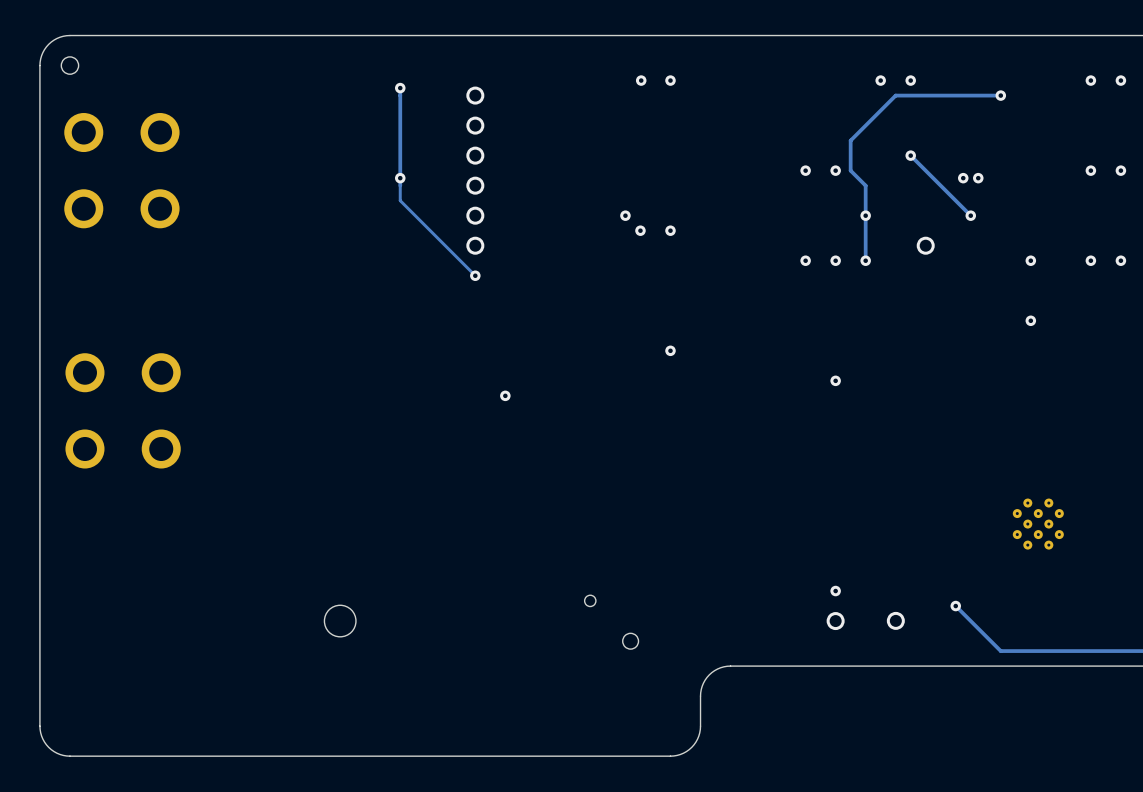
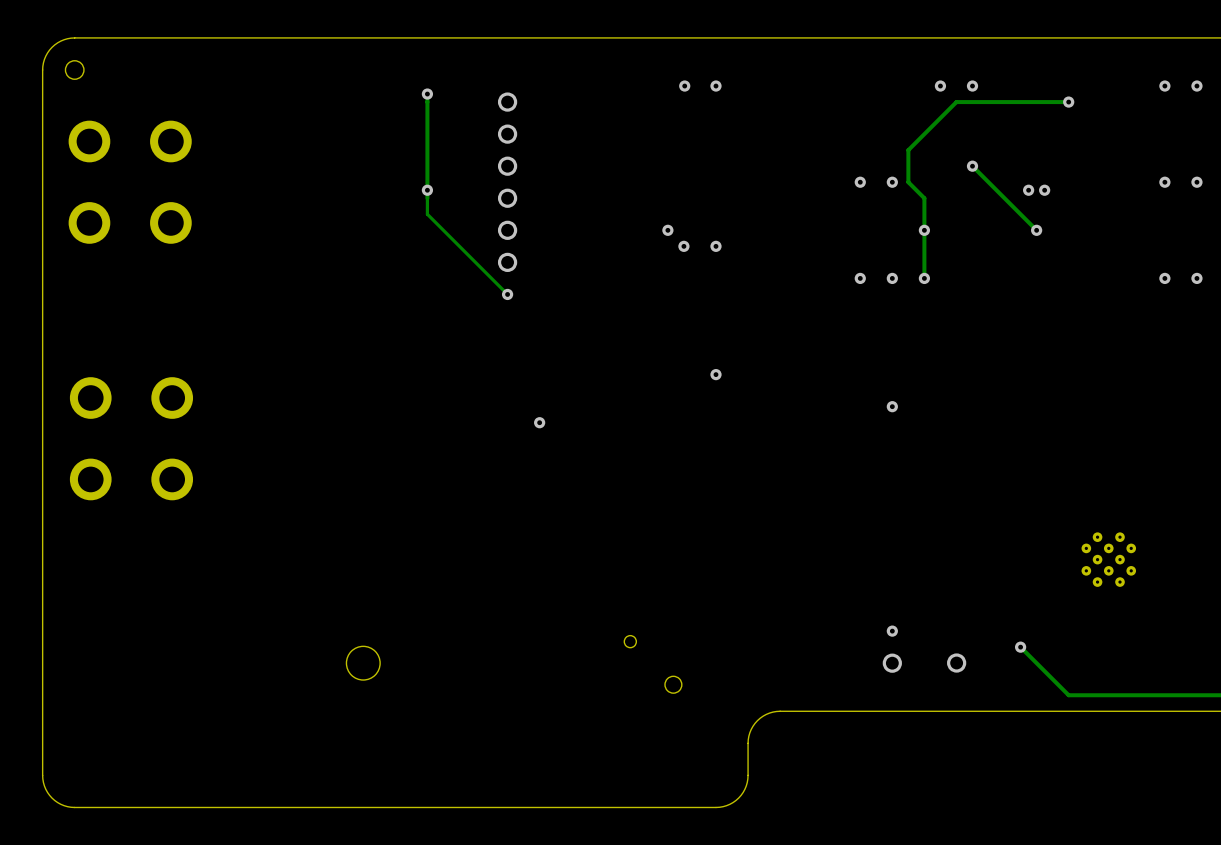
via: (925, 245) -> none
via: (1030, 260) -> none
via: (1030, 320) -> none

